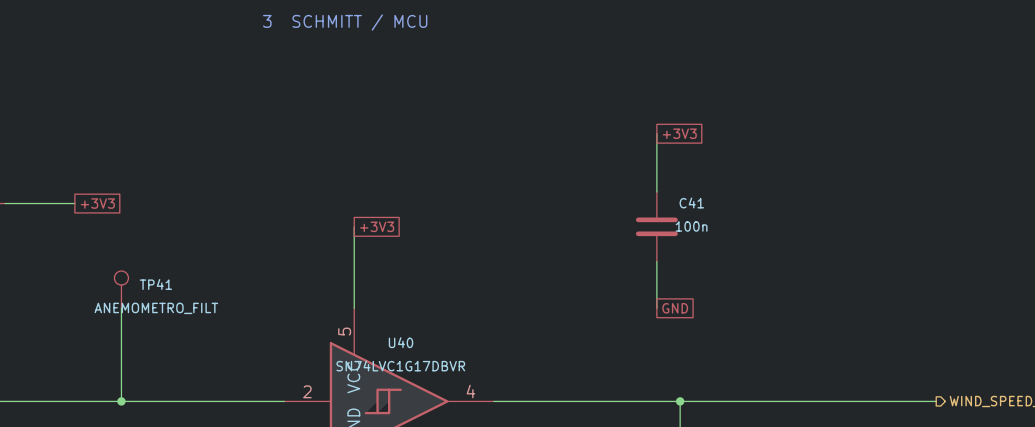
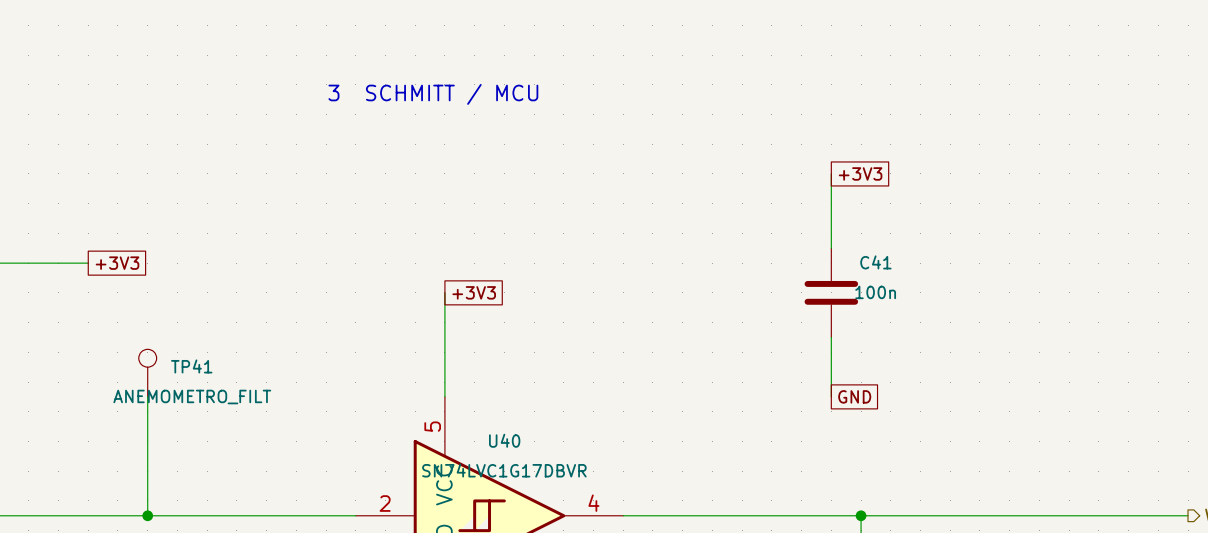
text position: 3 SCHMITT / MCU (345, 22) -> 3 SCHMITT / MCU (433, 94)

